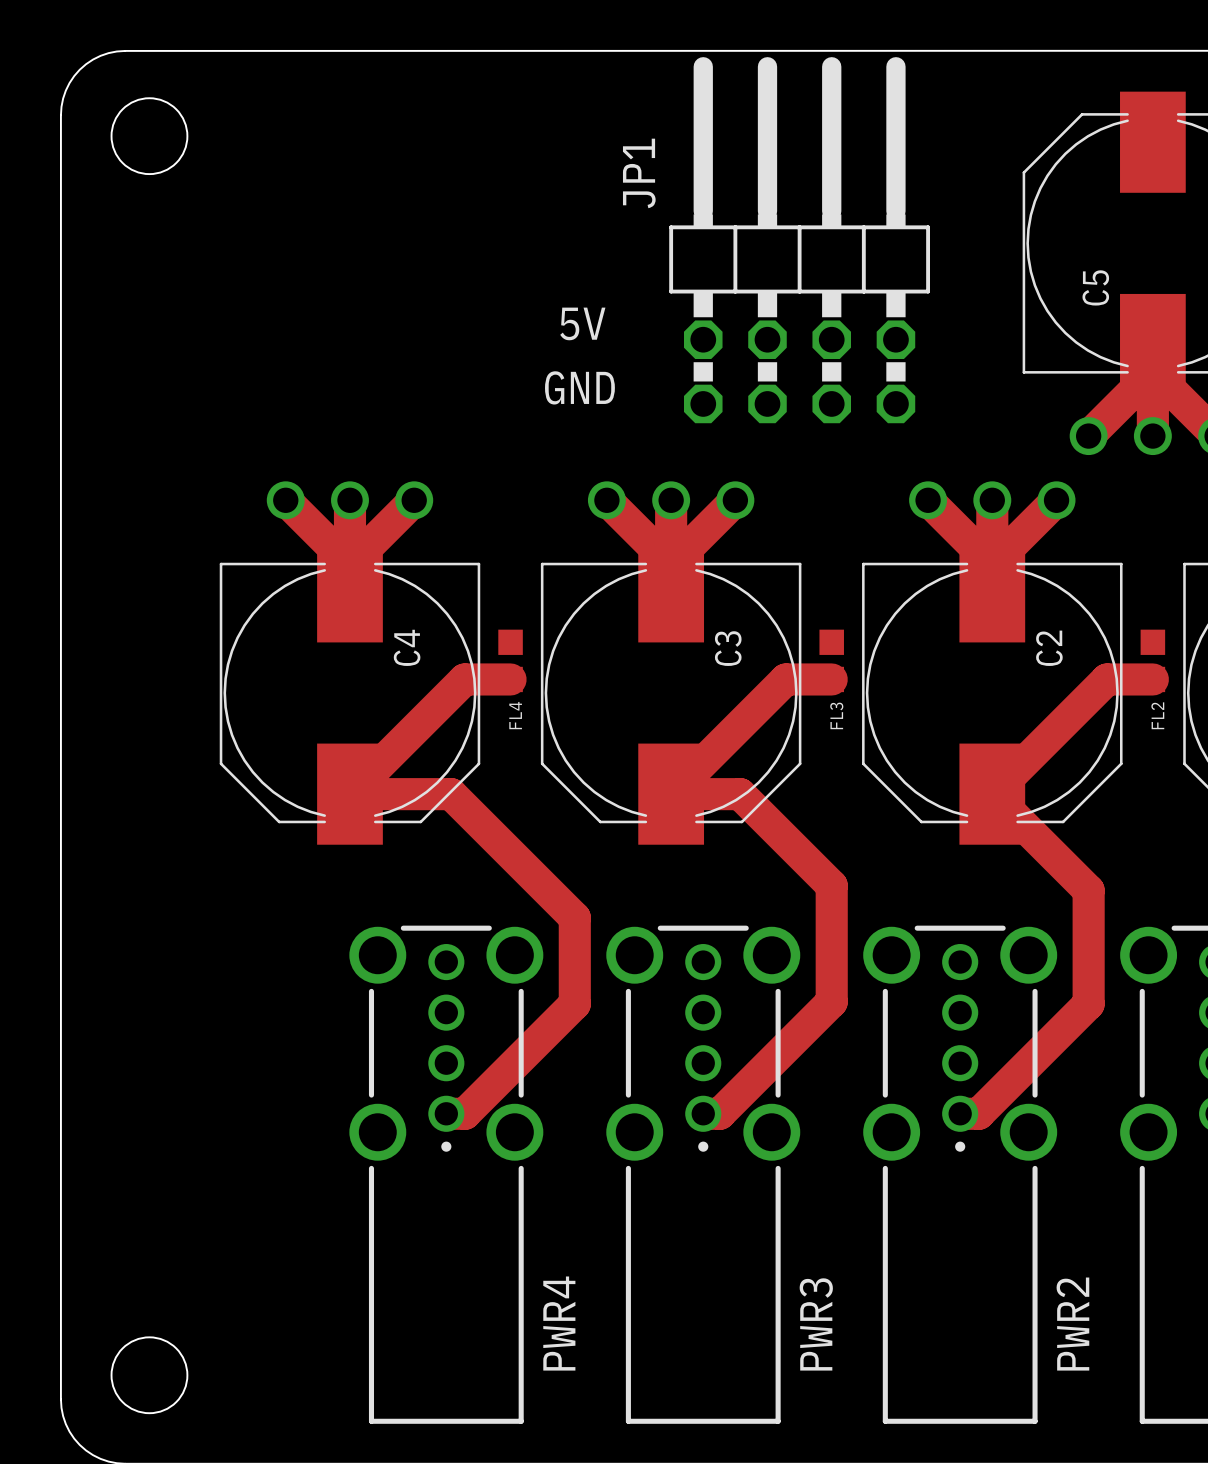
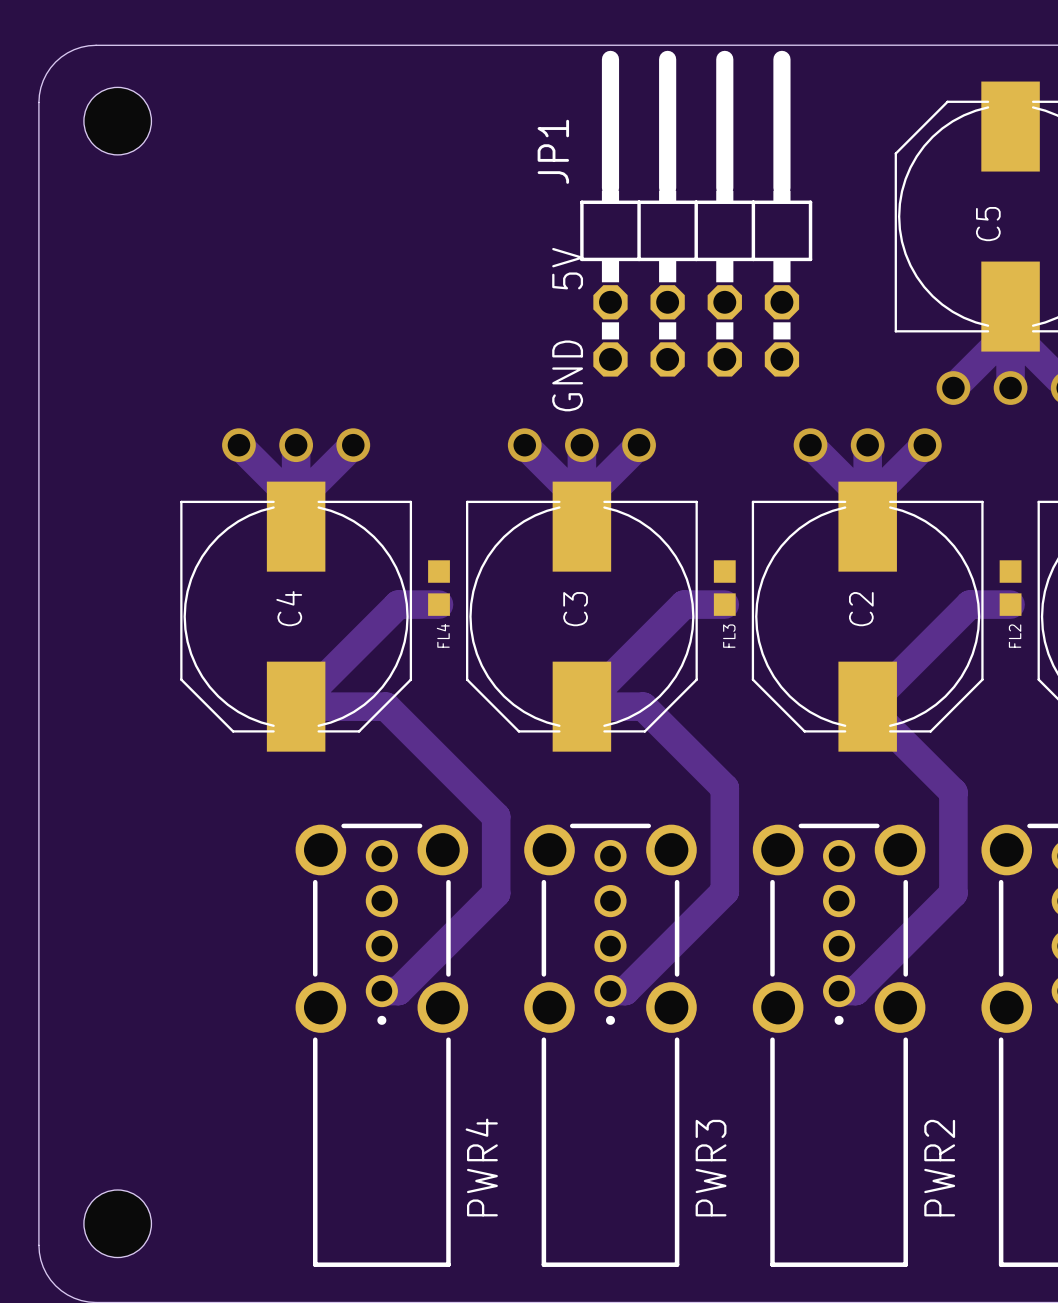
C5 name position: C5 (1095, 287) -> C5 (988, 224)
text rotation: 0° (582, 323) -> 90° counterclockwise (567, 268)
text position: 5V (582, 323) -> 5V (567, 268)
text rotation: 0° (579, 387) -> 90° counterclockwise (567, 375)
C4 name position: C4 (407, 647) -> C4 (289, 608)
C3 name position: C3 (728, 648) -> C3 (575, 609)
C2 name position: C2 (1049, 648) -> C2 (861, 609)

